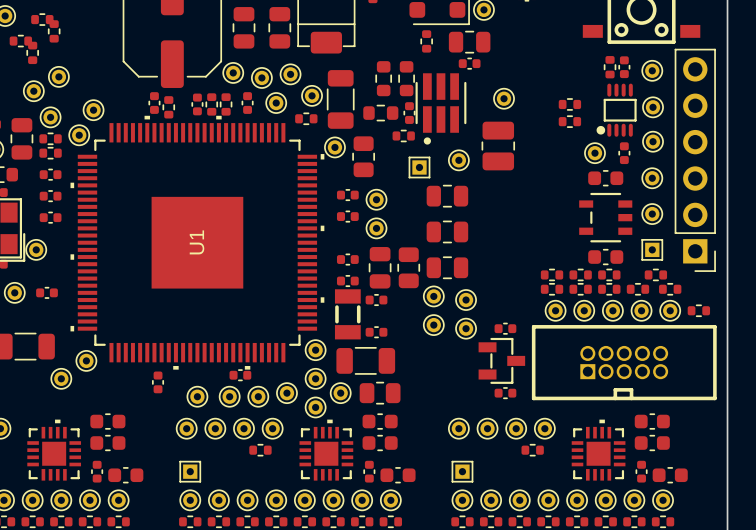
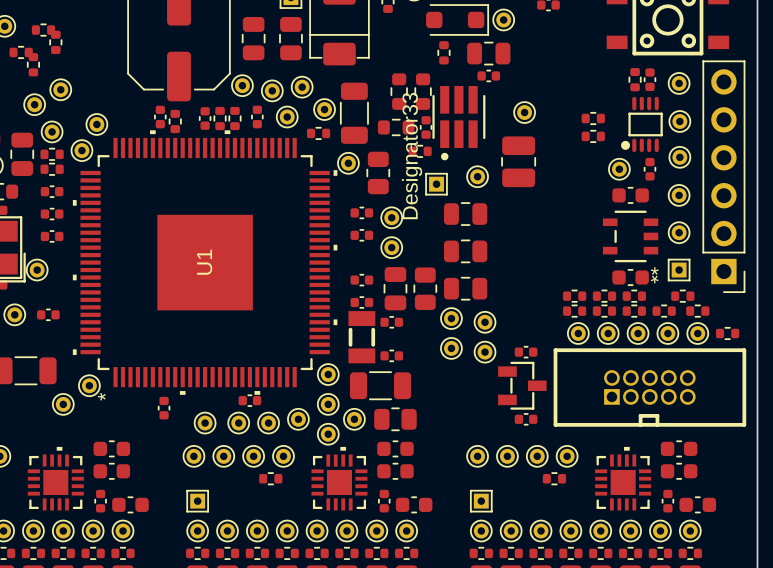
part text: none -> Designator33 (412, 156)
part footprint: [579, 192, 633, 243] -> [602, 210, 659, 263]
U1 text: none -> * (101, 396)

